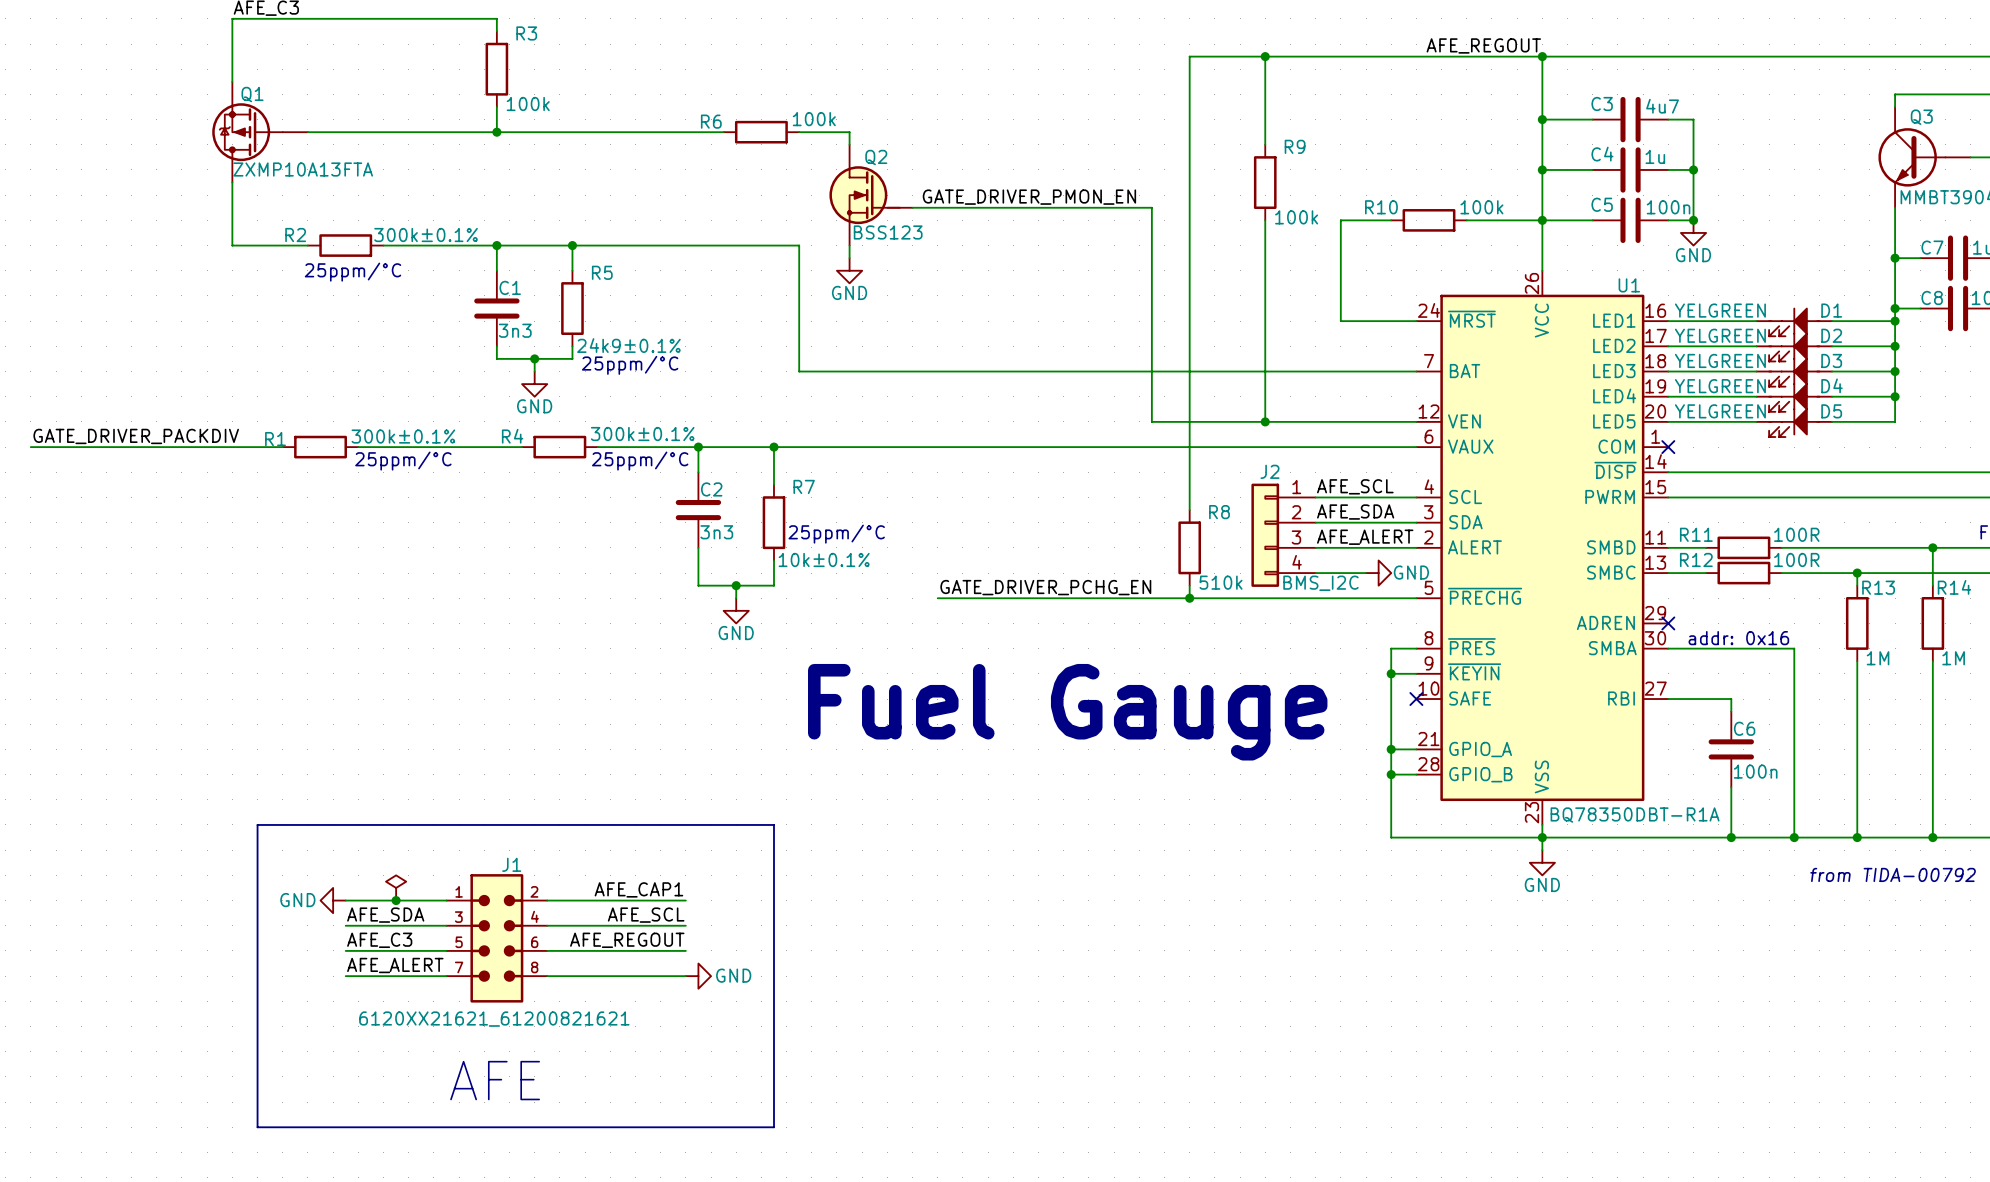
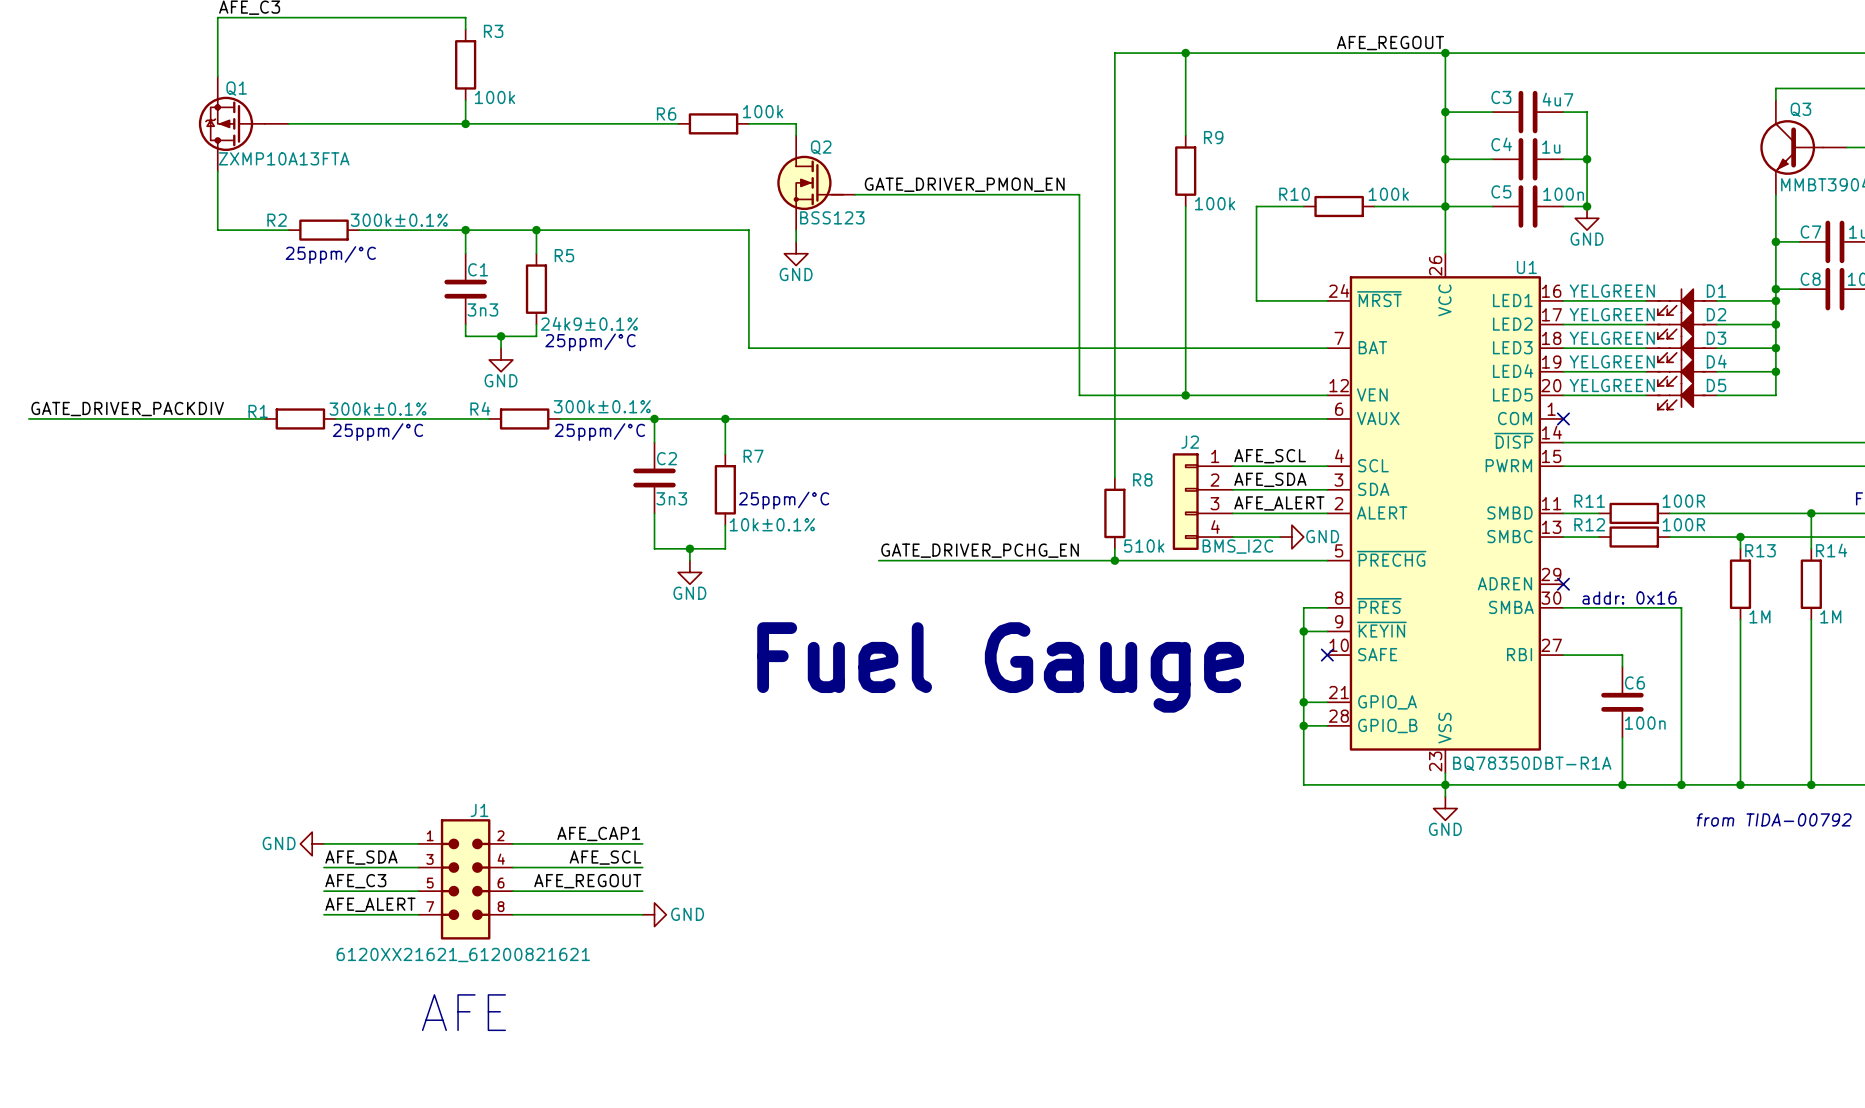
line: (257, 824) (774, 824) (774, 1127) (257, 1127) (257, 824) -> none
power symbol: (396, 887) -> none
junction: (396, 900) -> none

